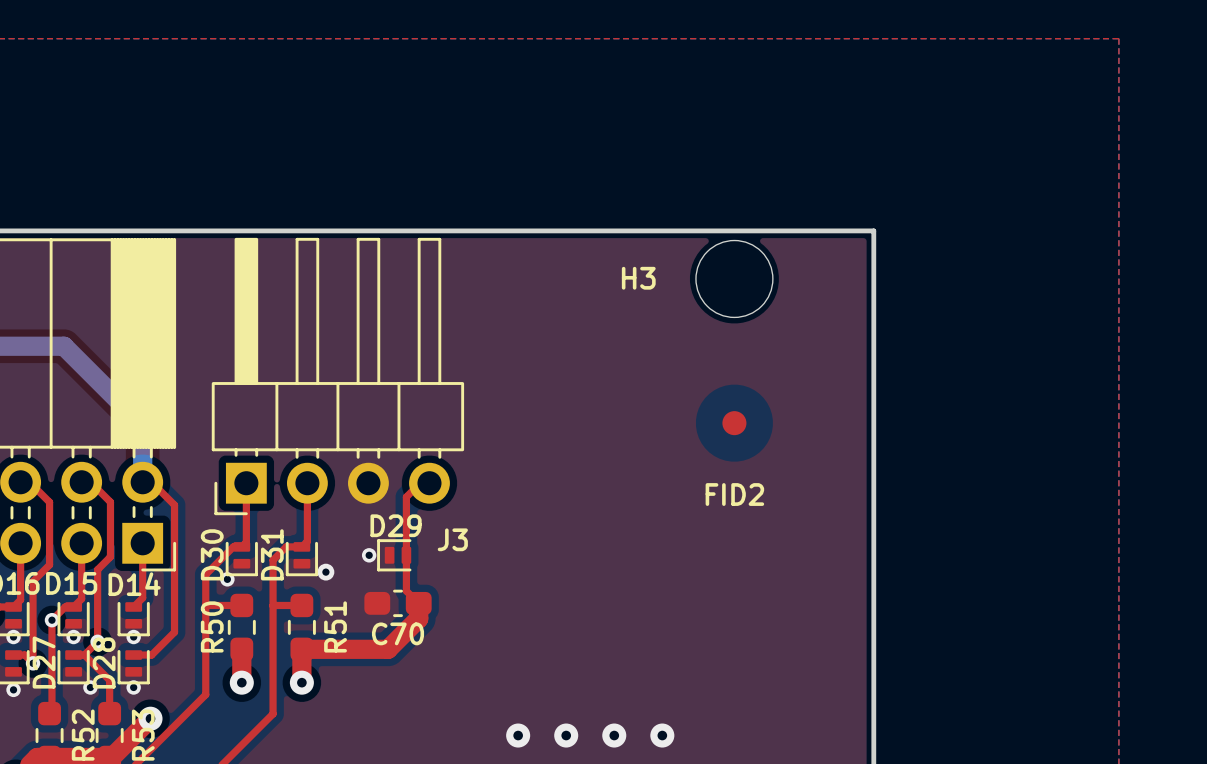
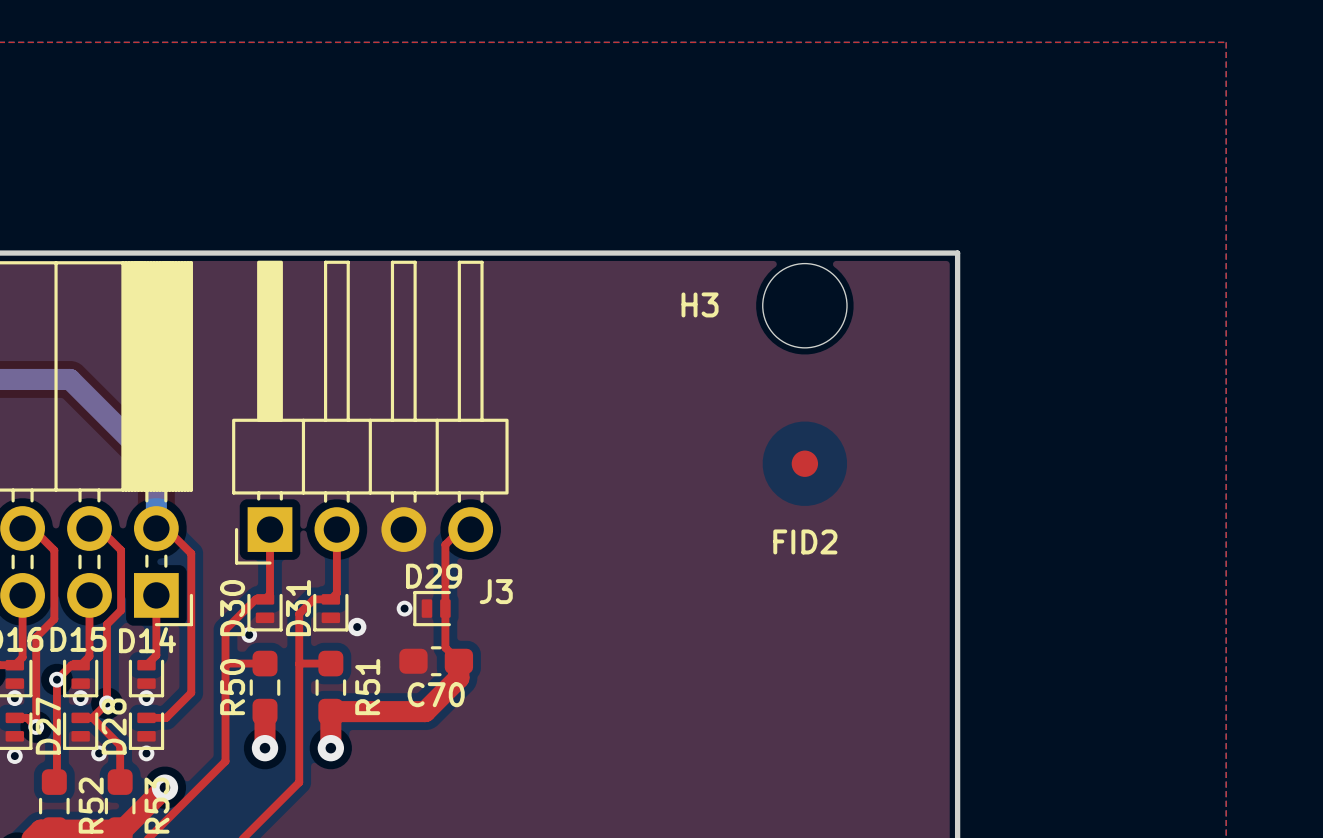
via: (518, 735) -> none
via: (566, 735) -> none
via: (614, 735) -> none
via: (662, 735) -> none

